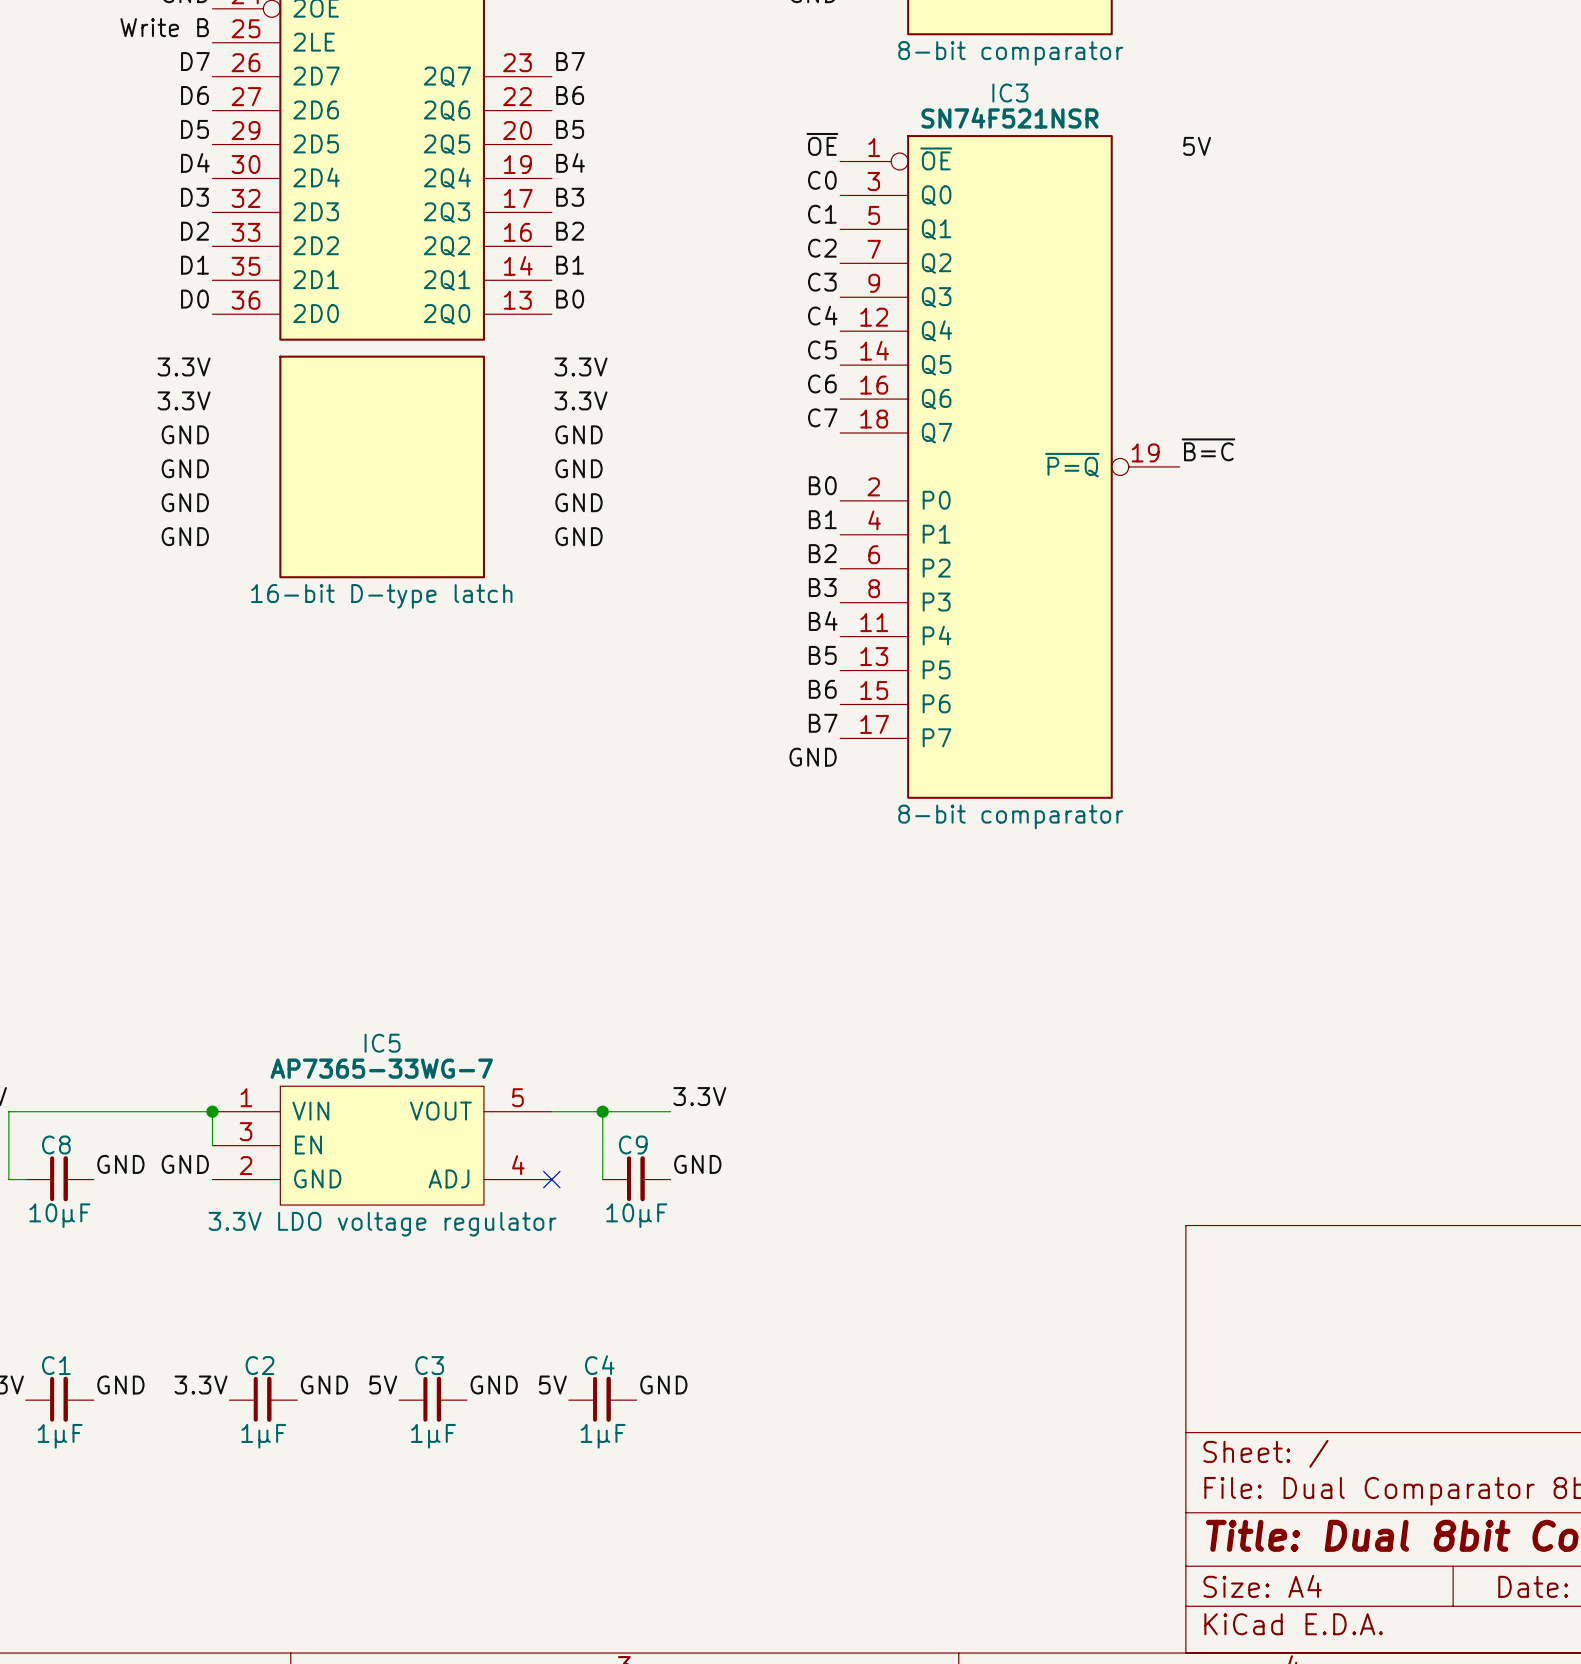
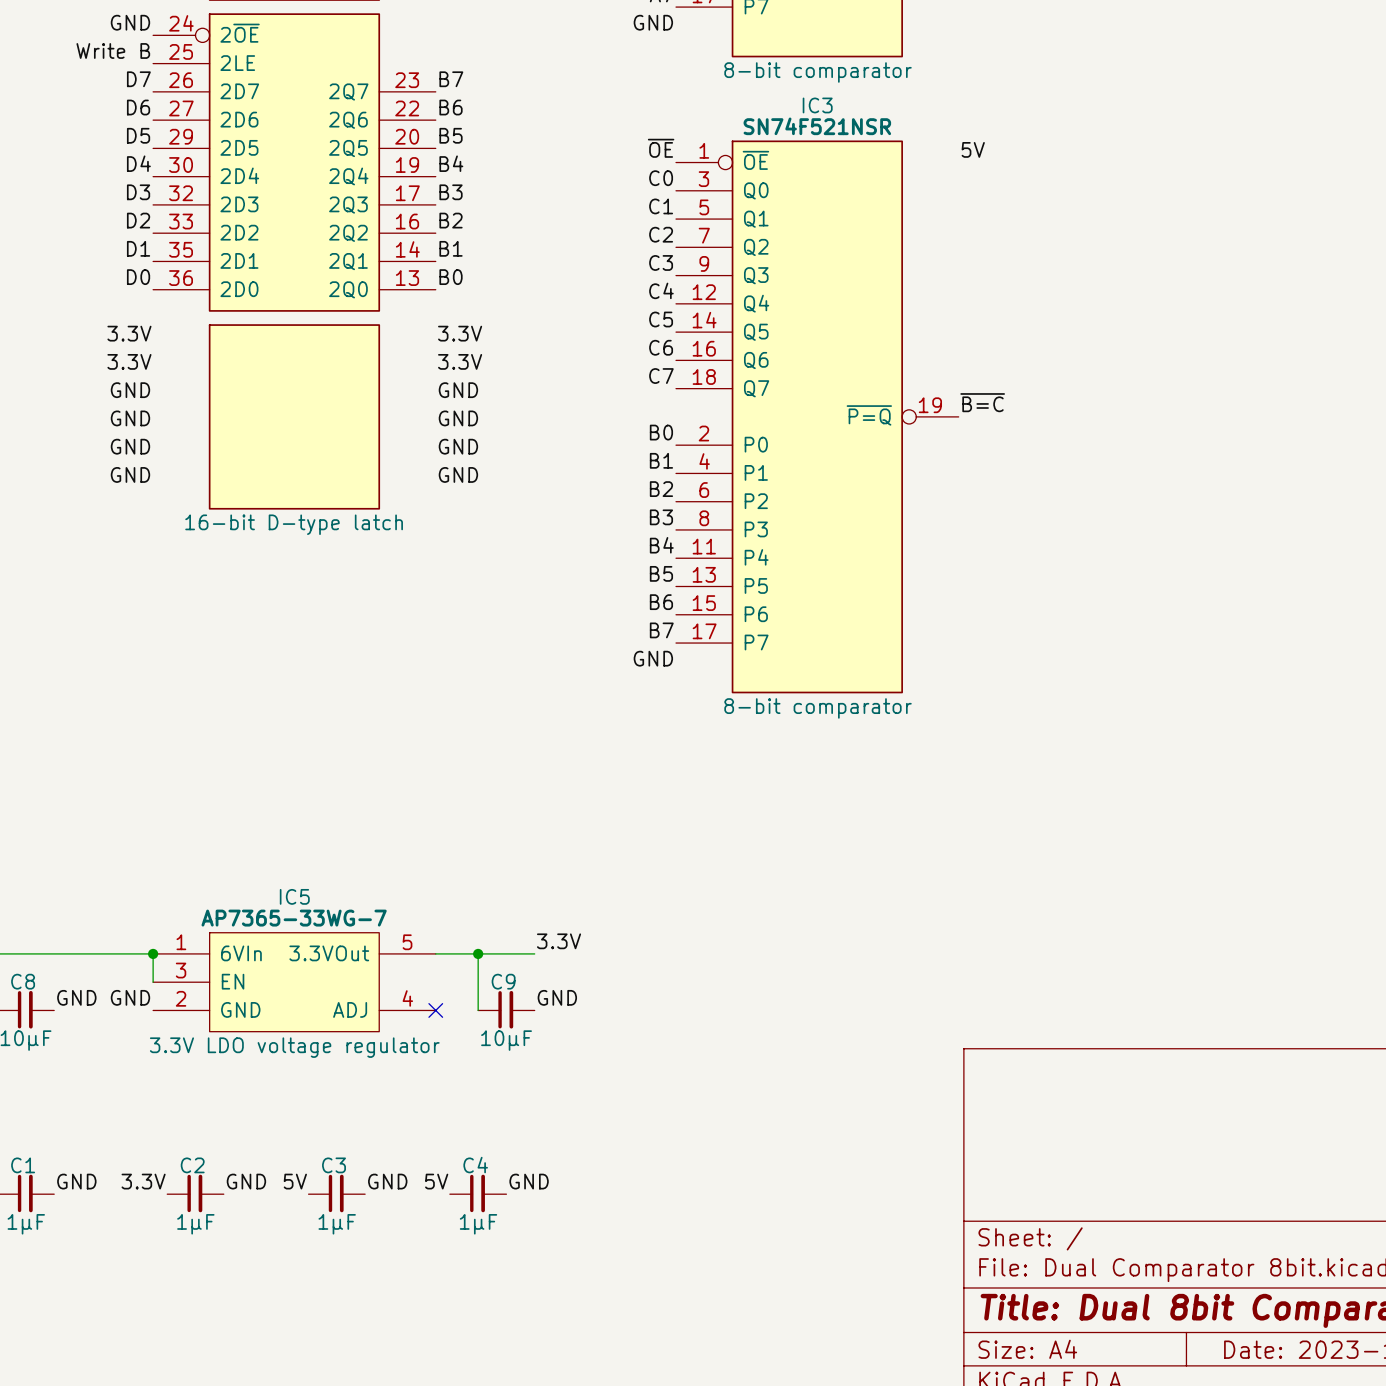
IC5 pin name: VIN (310, 1111) -> 6VIn (241, 953)
IC5 pin name: VOUT (440, 1111) -> 3.3VOut (329, 953)

